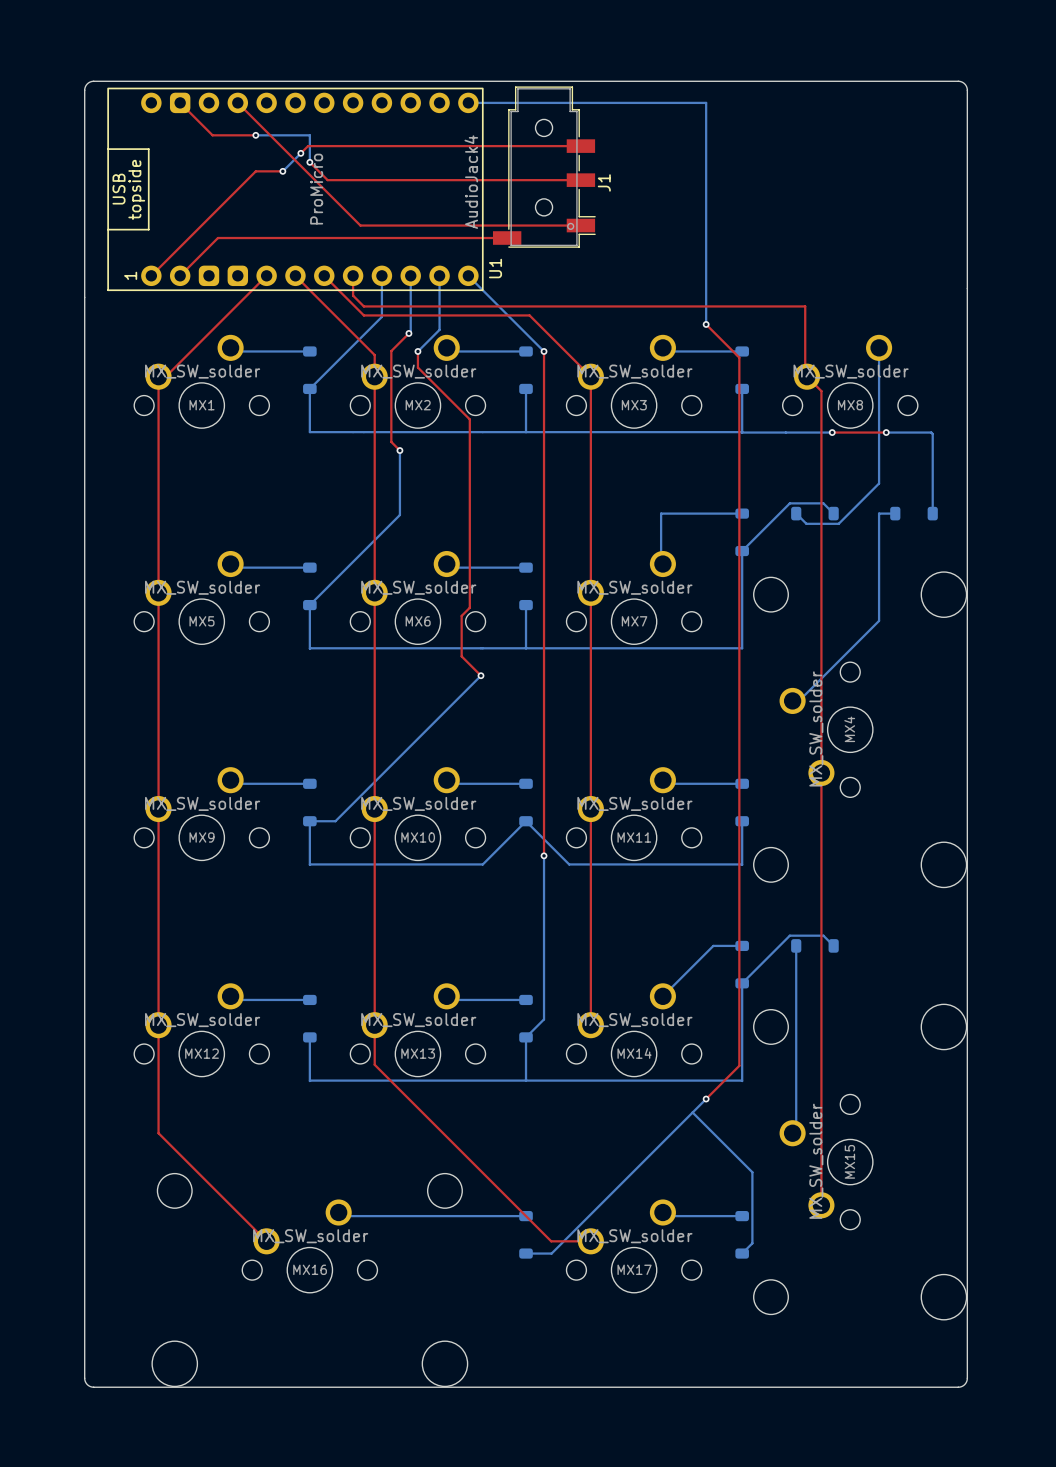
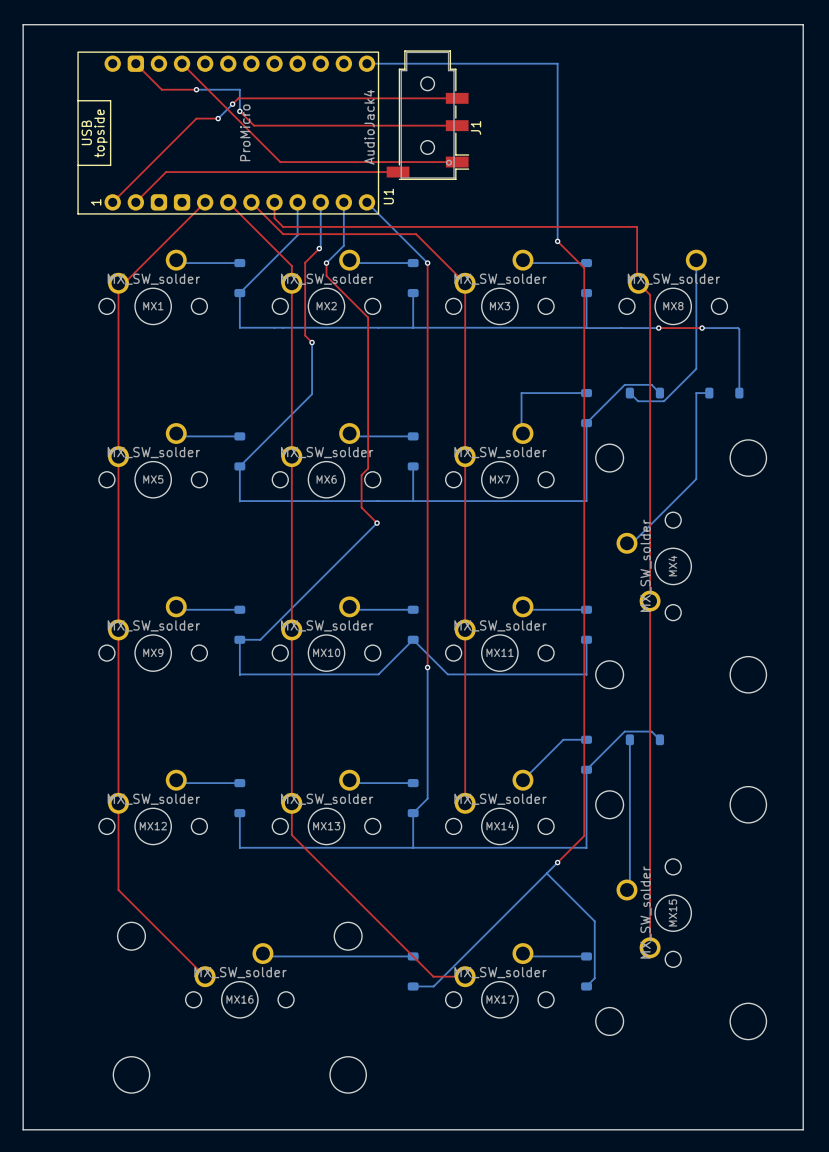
board edge: (93, 81) (958, 81) (966, 85) (967, 1378) (962, 1386) (93, 1387) (85, 1382) (84, 90) (87, 83) (93, 81) -> (23, 24) (23, 1129) (803, 1129) (803, 24) (23, 24)

